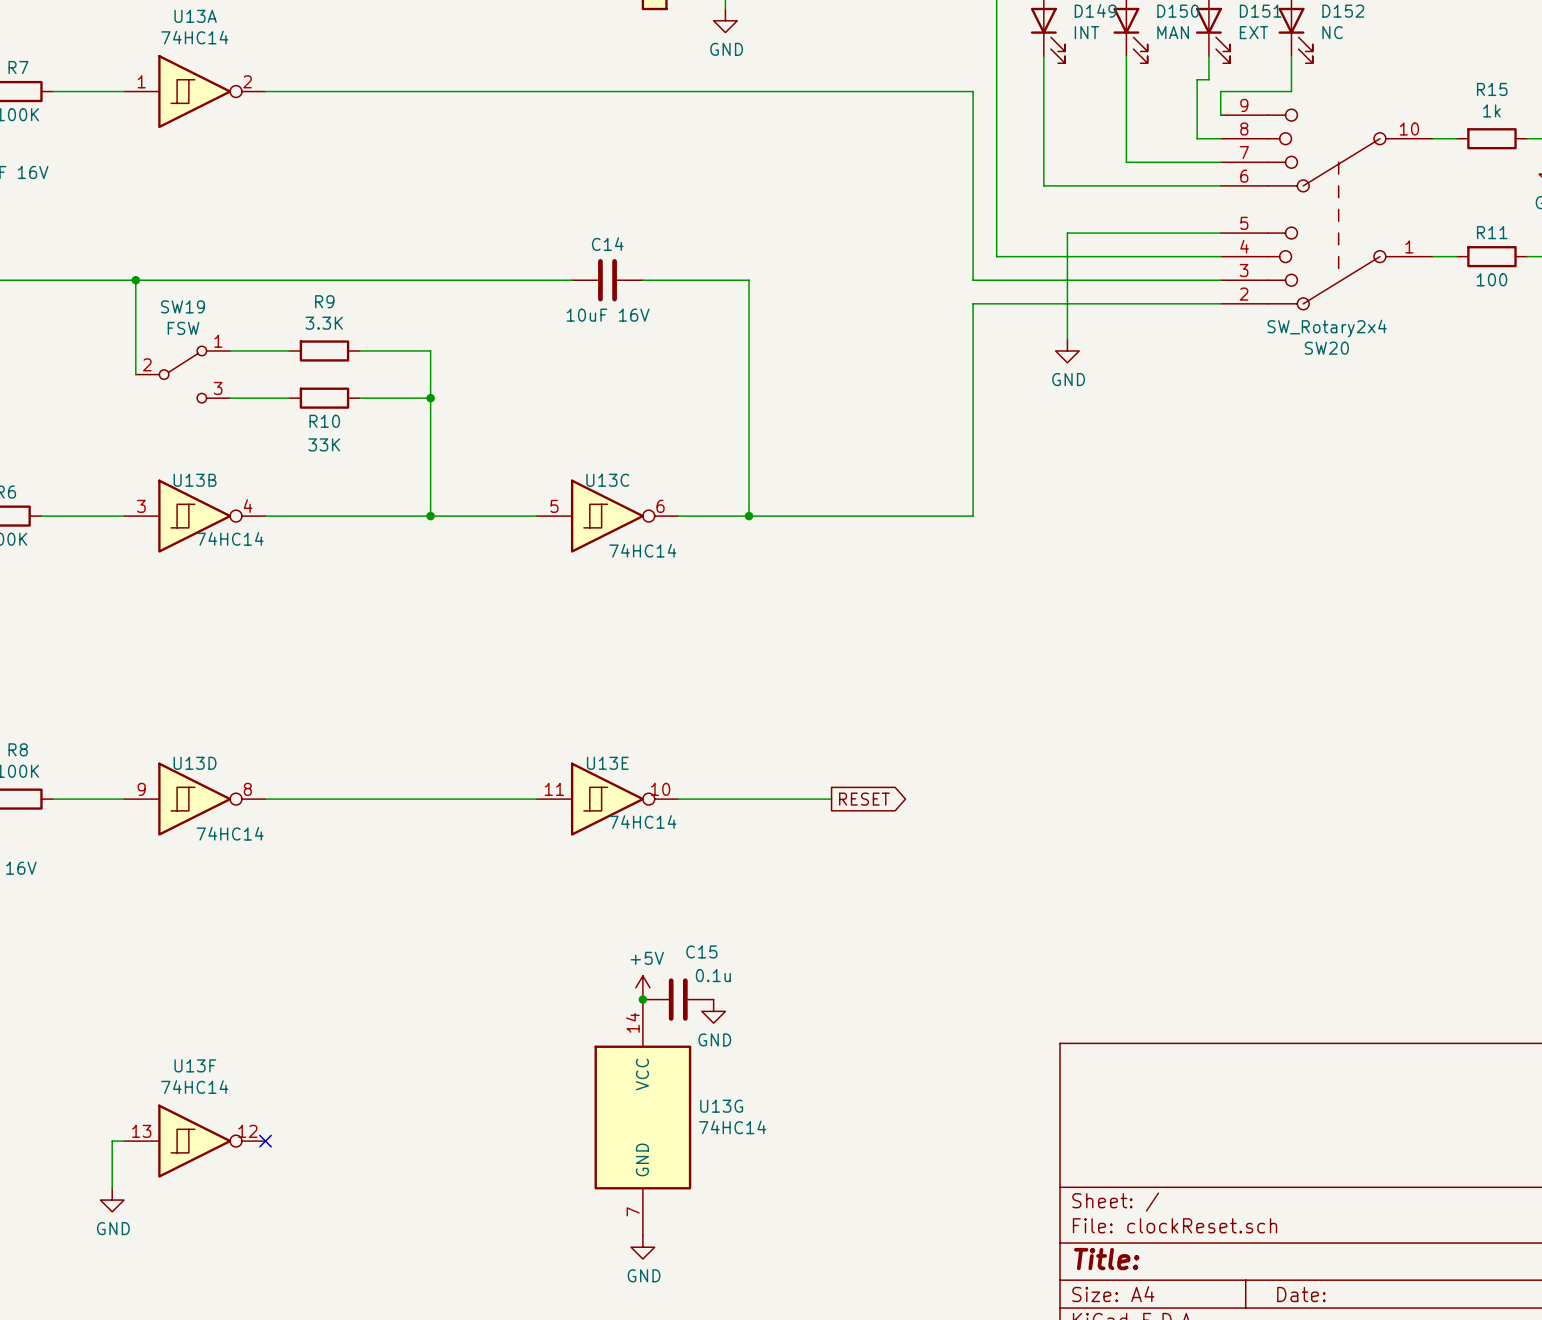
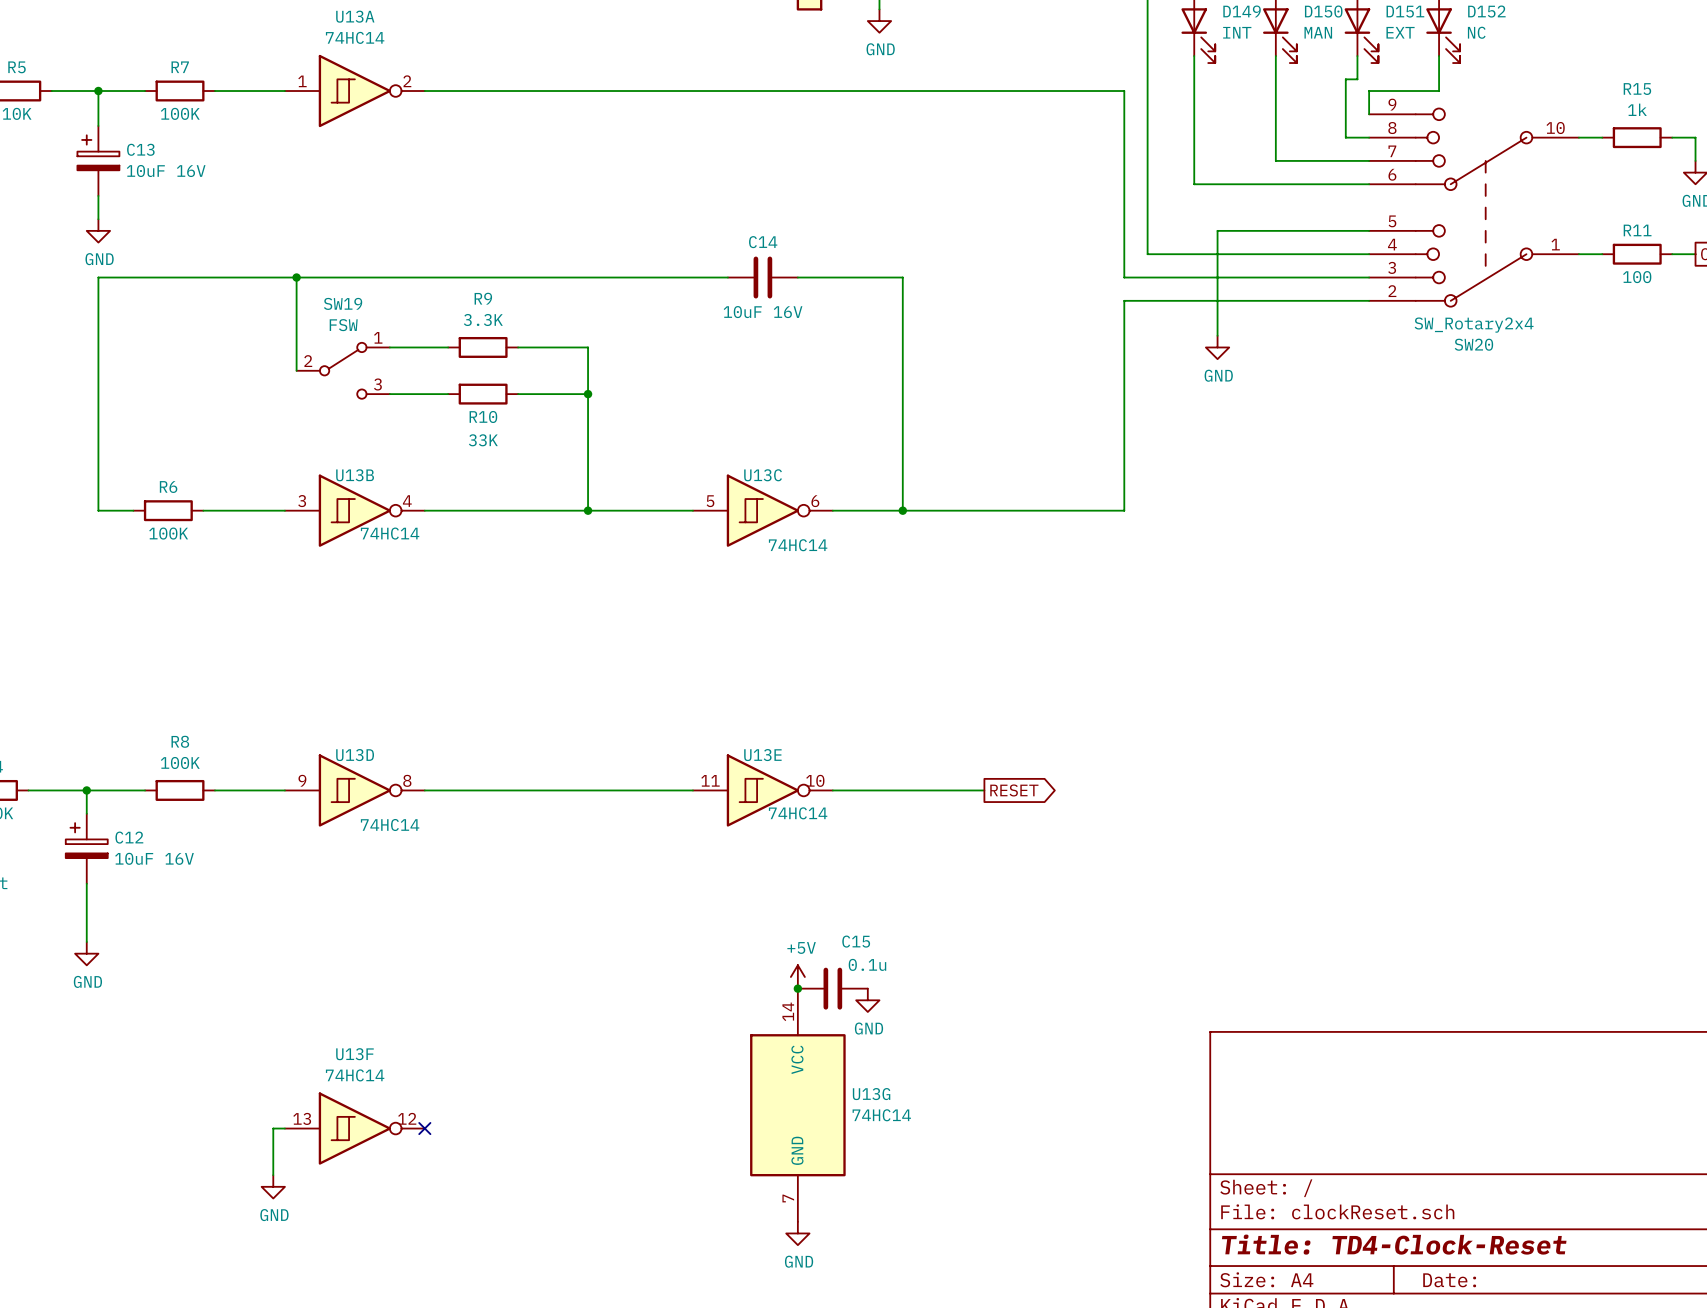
title block: Title: (1106, 1259) -> Title: TD4-Clock-Reset (1394, 1244)

